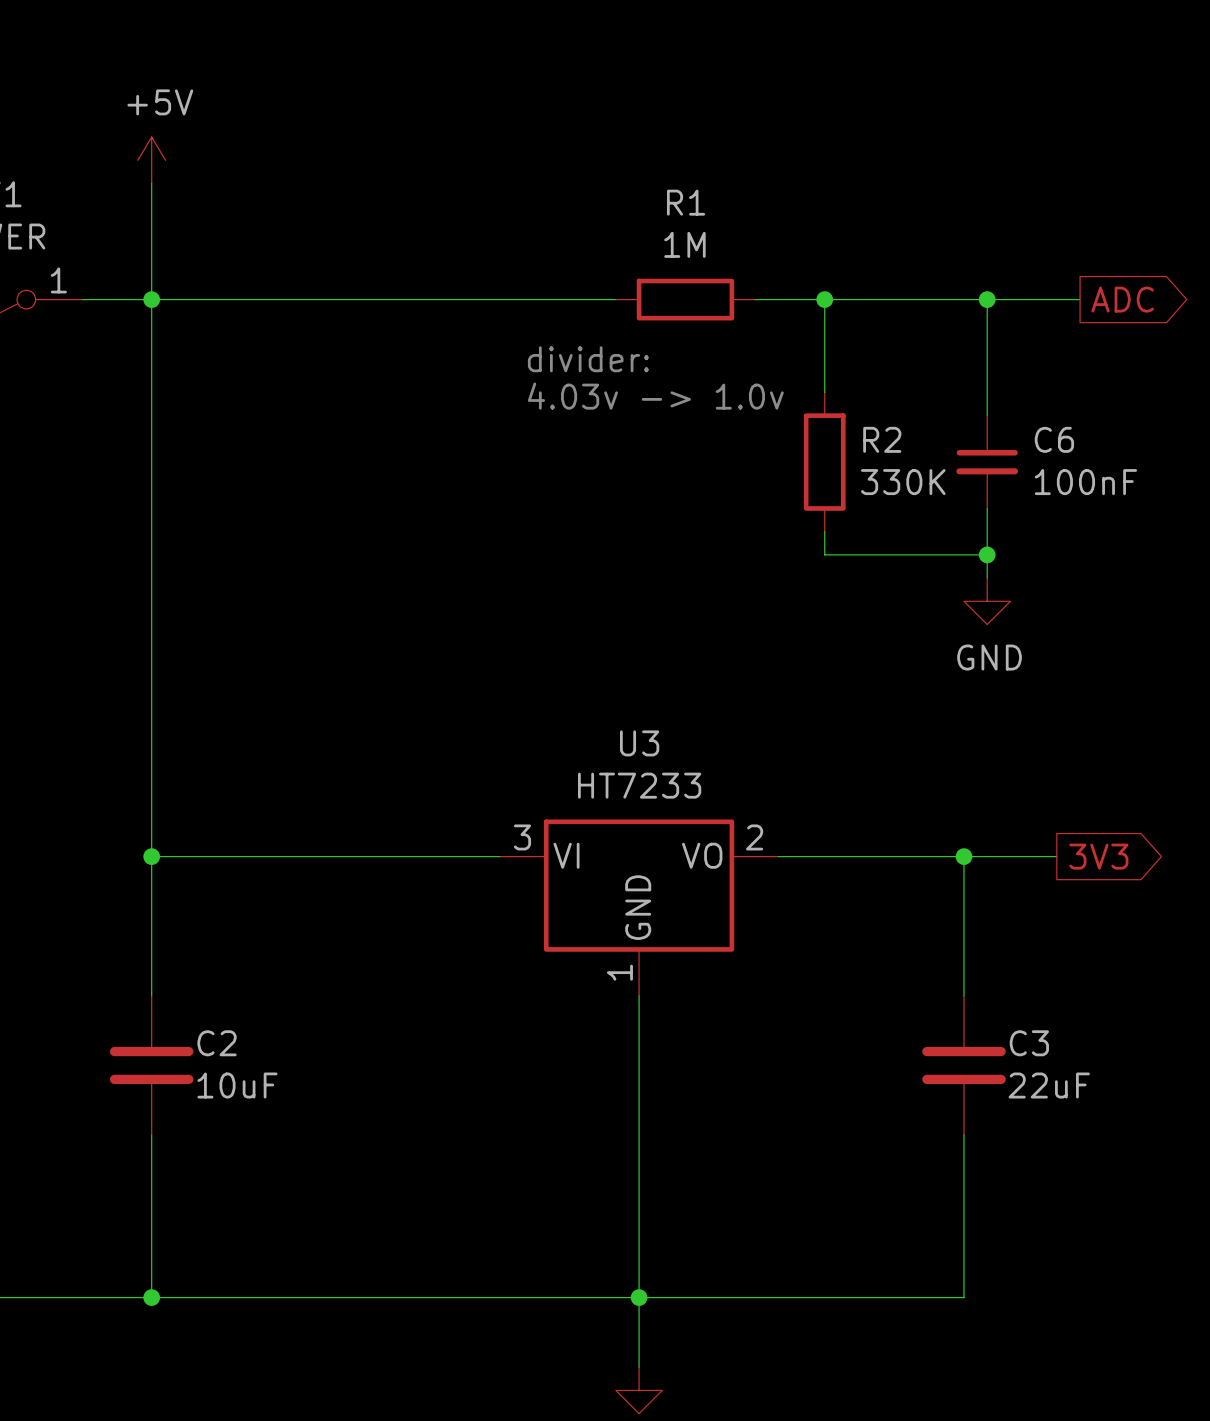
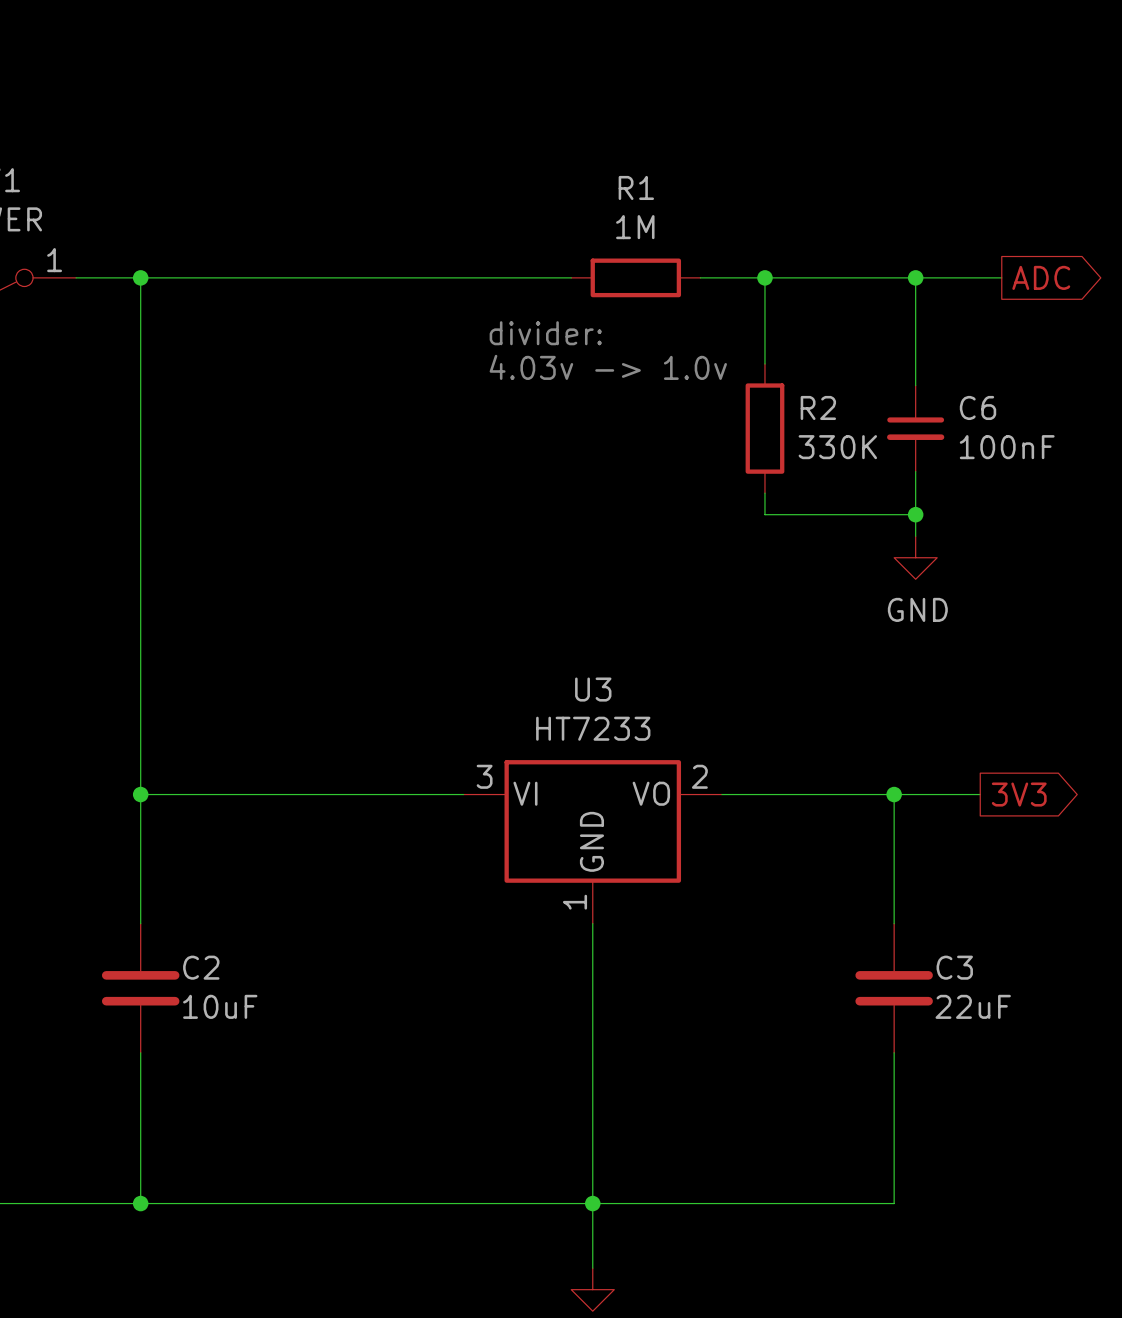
power symbol: +5V (151, 160) -> none
wire: (151, 183) (151, 299) -> none

